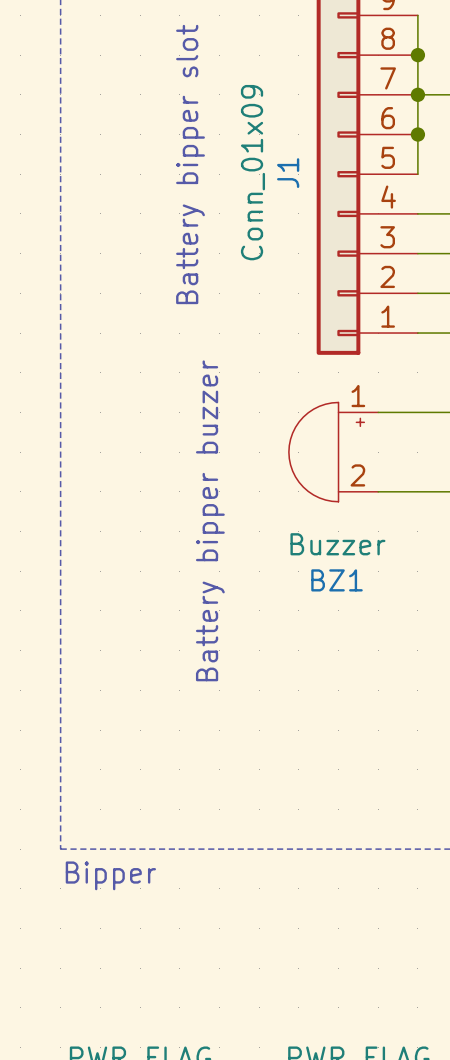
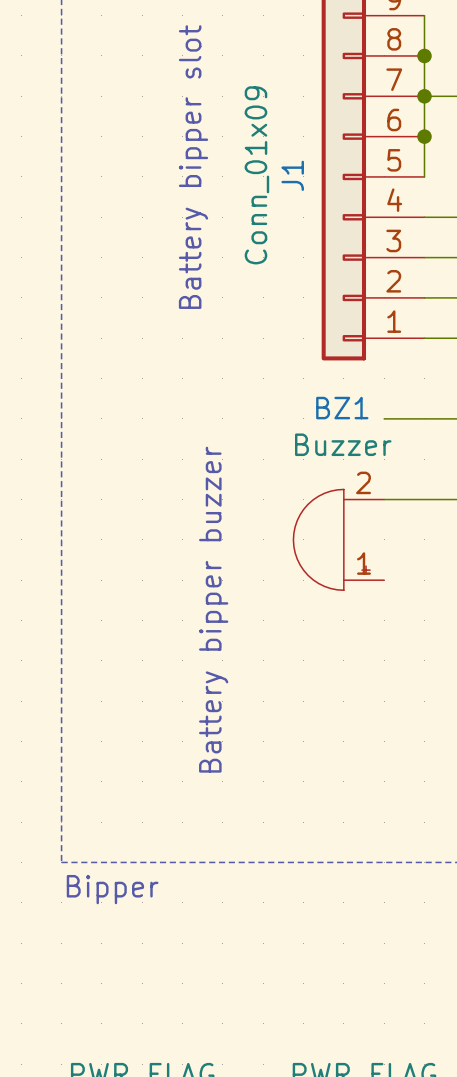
BZ1 flip: as is (326, 452) -> up-down (331, 539)
BZ1 position: (333, 452) -> (338, 539)
text position: Battery bipper buzzer (210, 520) -> Battery bipper buzzer (213, 609)

